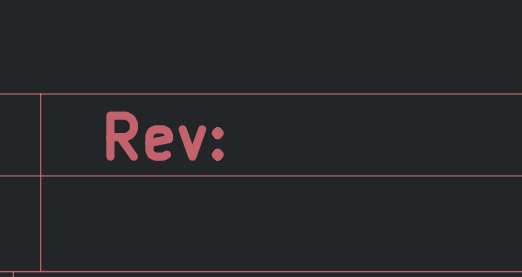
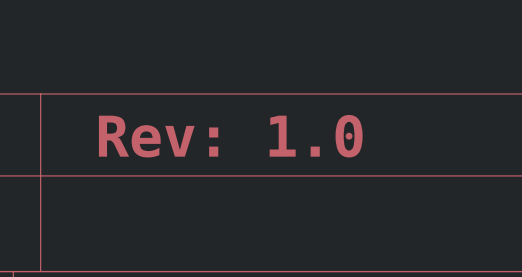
title block: Rev: (165, 136) -> Rev: 1.0 (230, 136)

